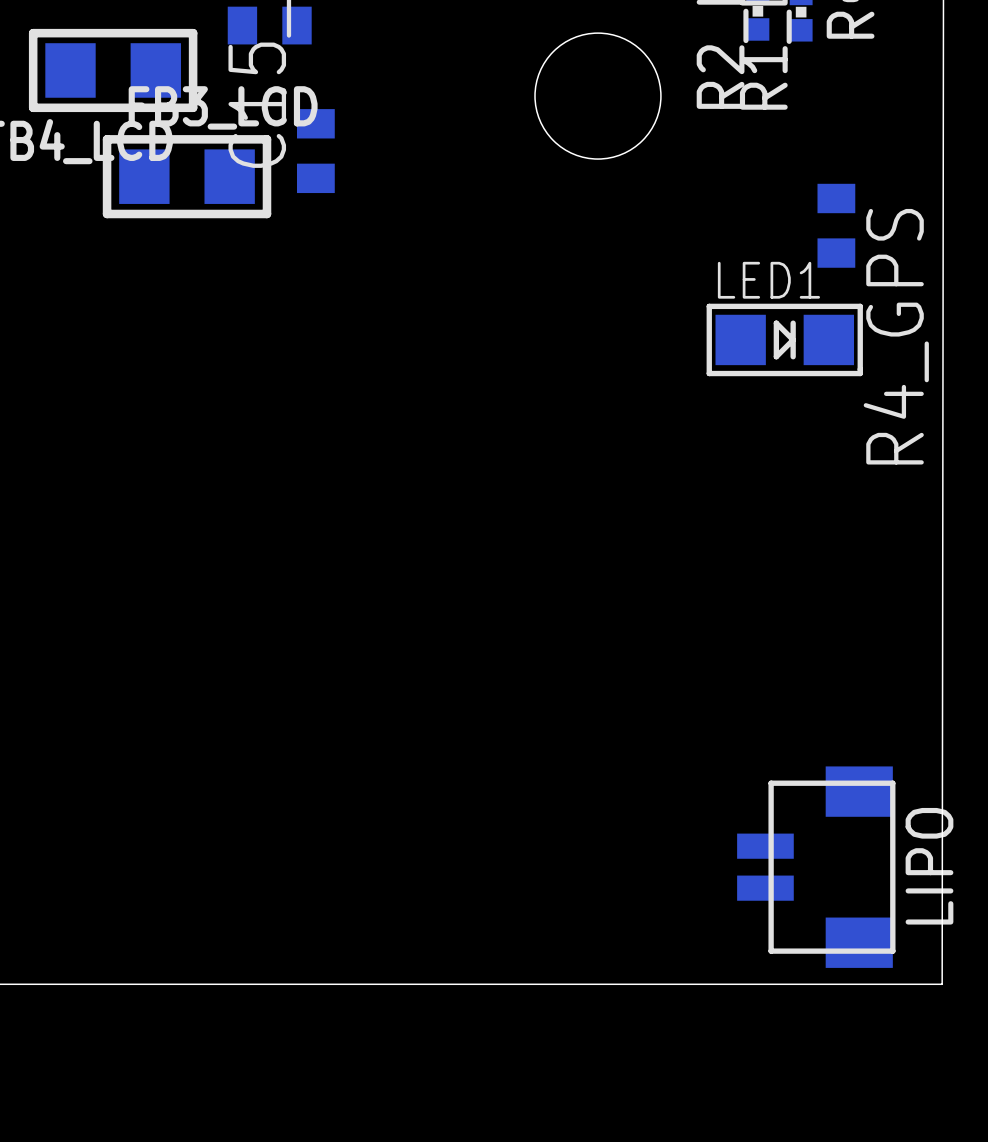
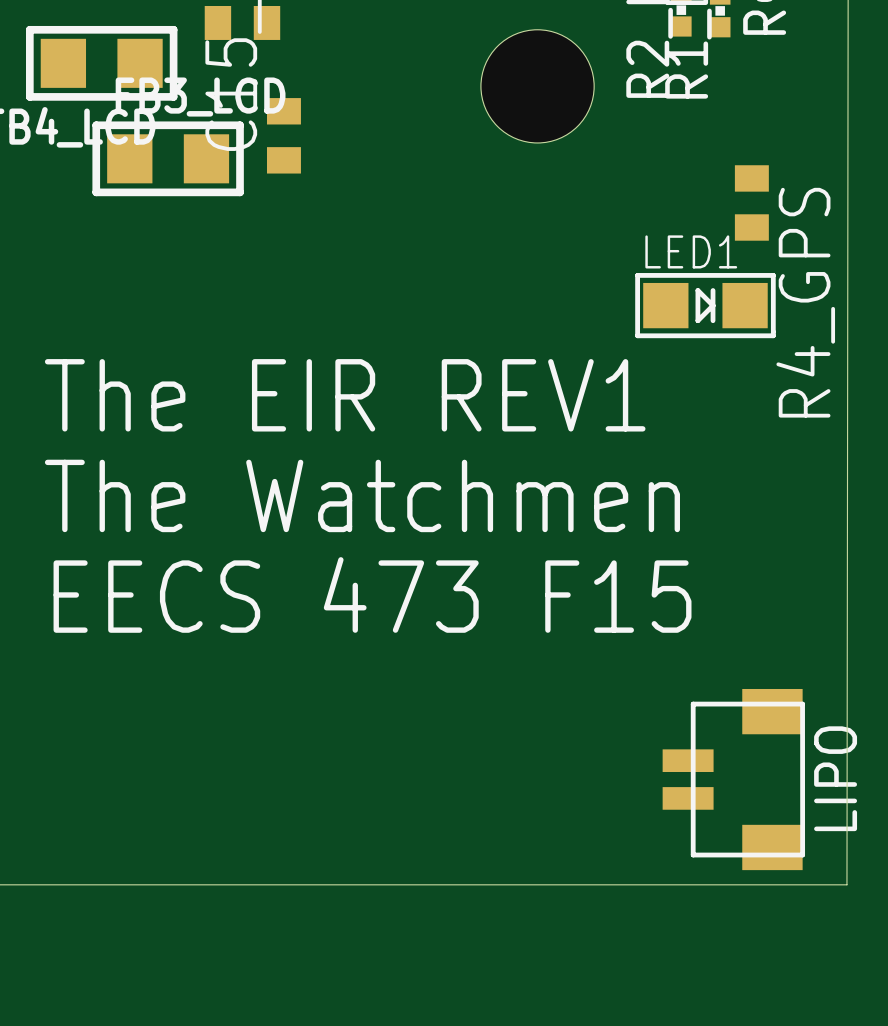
text: none -> The EIR REV1 (345, 395)
text: none -> The Watchmen (362, 495)
text: none -> EECS 473 F15 (372, 594)

